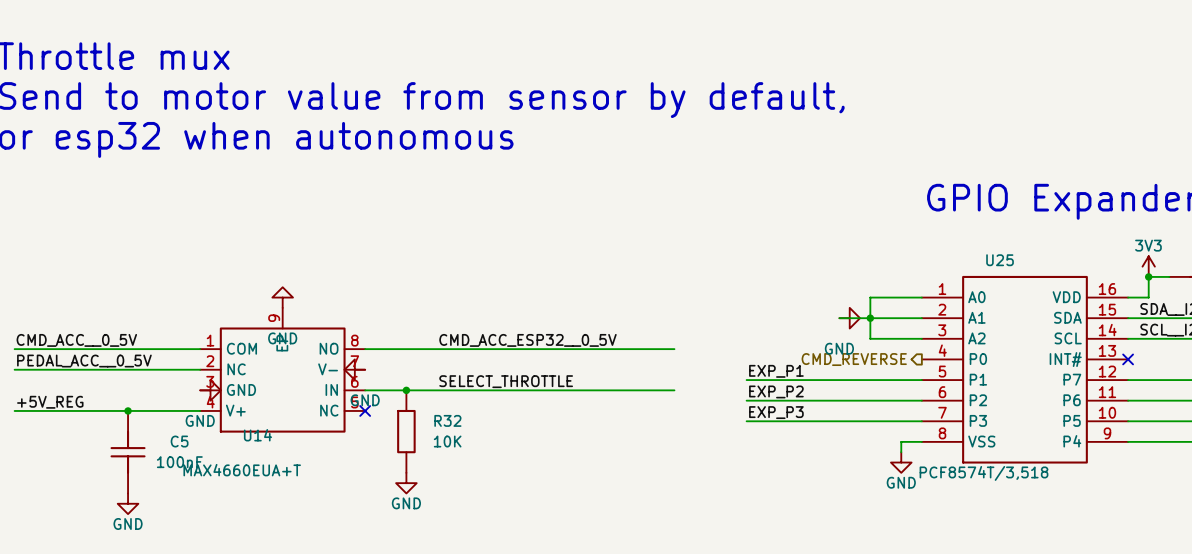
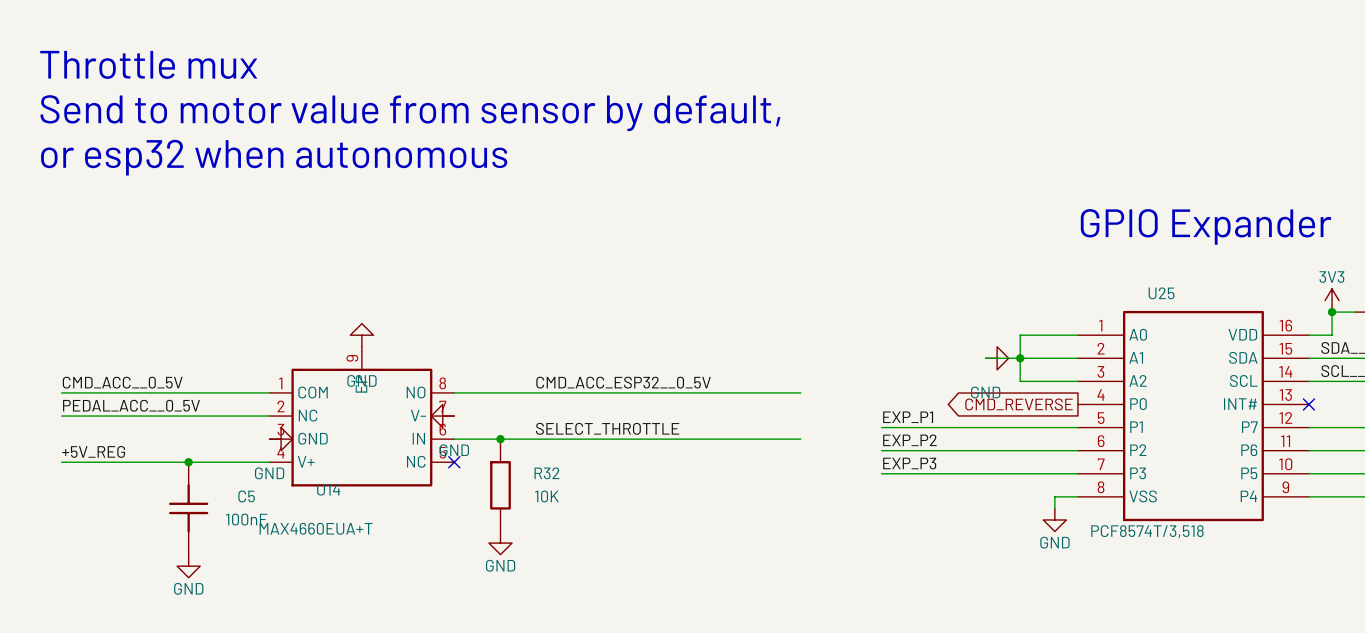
hierarchical label: CMD_REVERSE (854, 359) -> none
global label: none -> CMD_REVERSE (1019, 404)

